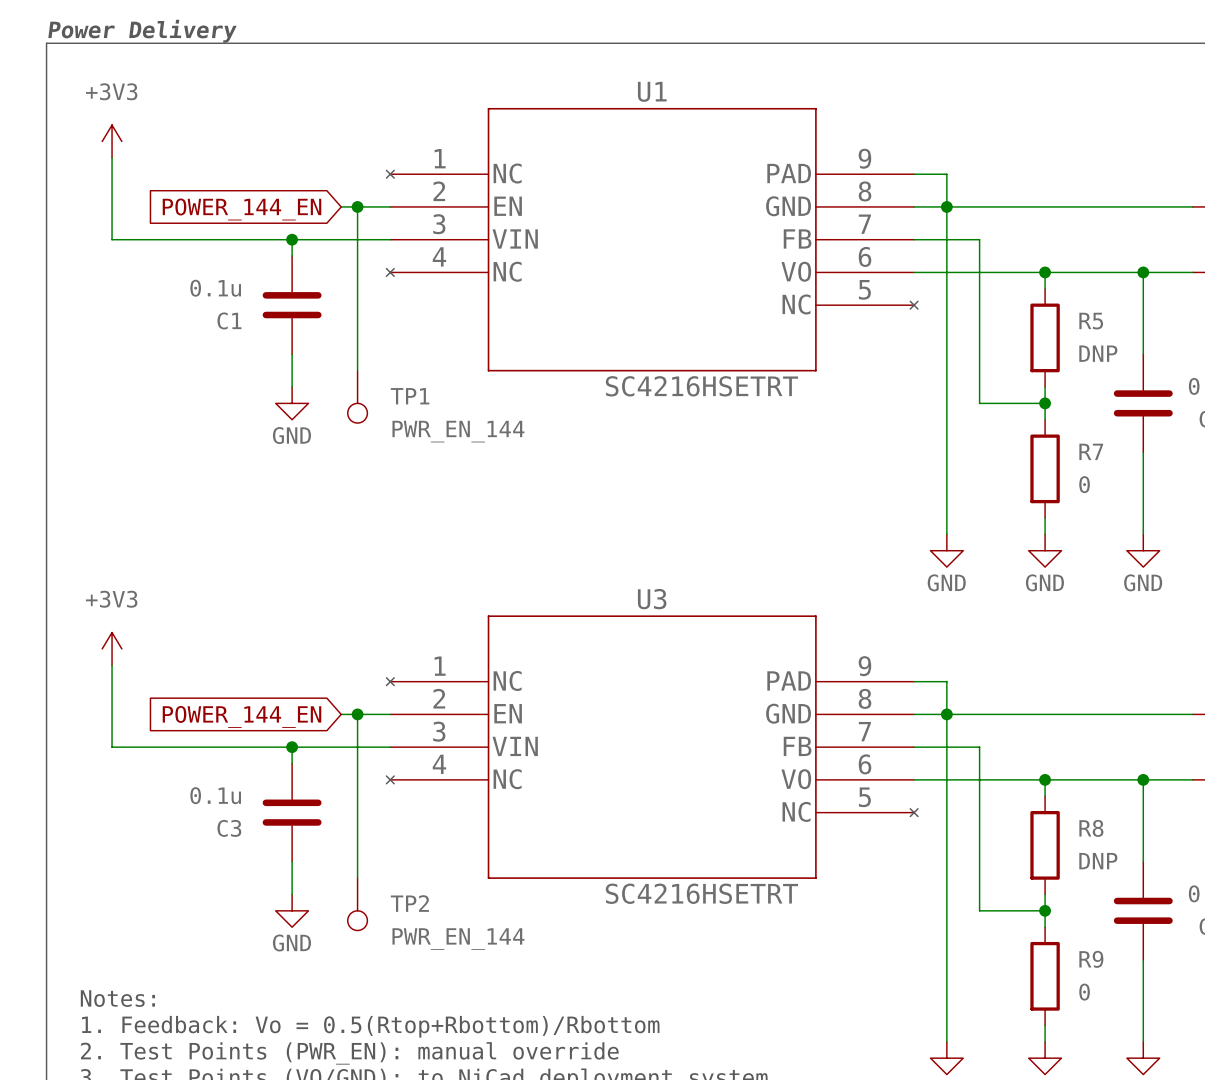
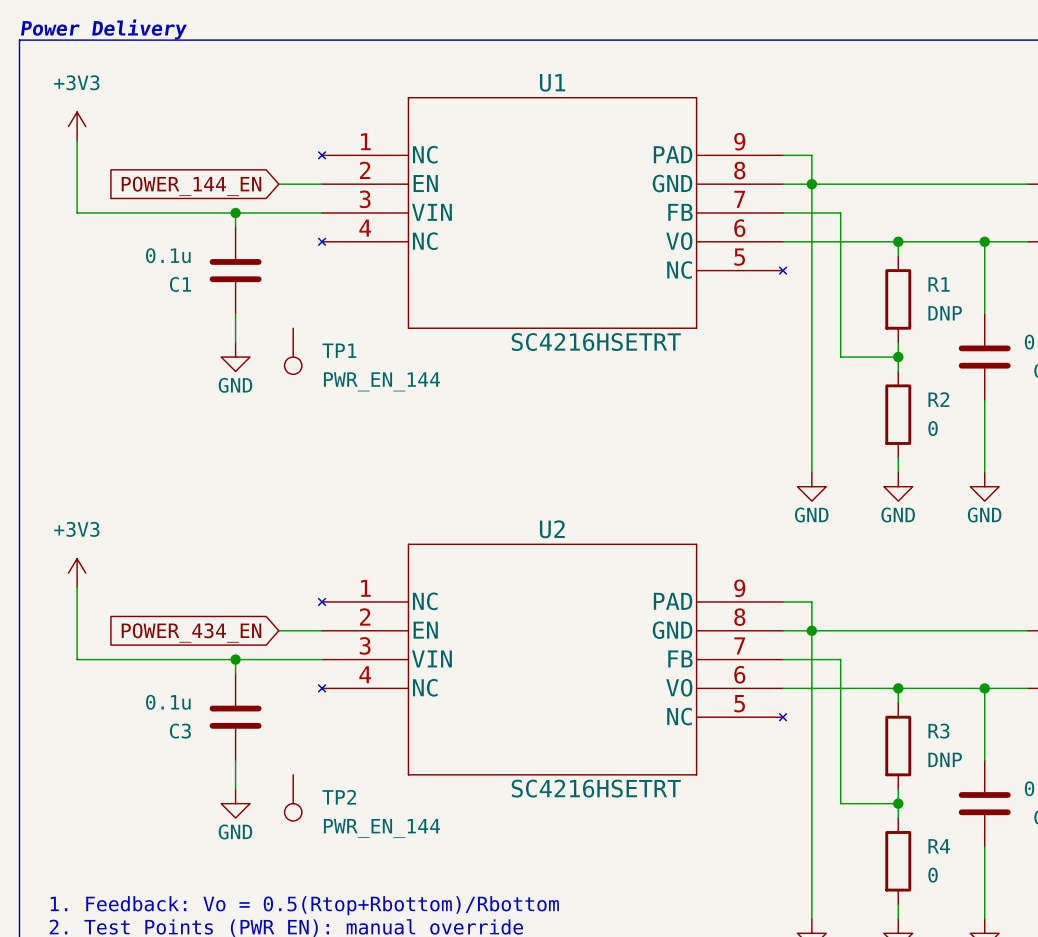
wire: (357, 206) (357, 370) -> none
junction: (357, 206) -> none
R5 name: R5 (1091, 321) -> R1 (939, 284)
R7 name: R7 (1091, 451) -> R2 (938, 399)
U3 name: U3 (652, 599) -> U2 (552, 529)
wire: (357, 714) (357, 878) -> none
junction: (357, 714) -> none
global label: POWER_144_EN (242, 716) -> POWER_434_EN (191, 632)
R8 name: R8 (1091, 828) -> R3 (938, 731)
R9 name: R9 (1091, 959) -> R4 (939, 846)
text: Notes: (117, 998) -> none

